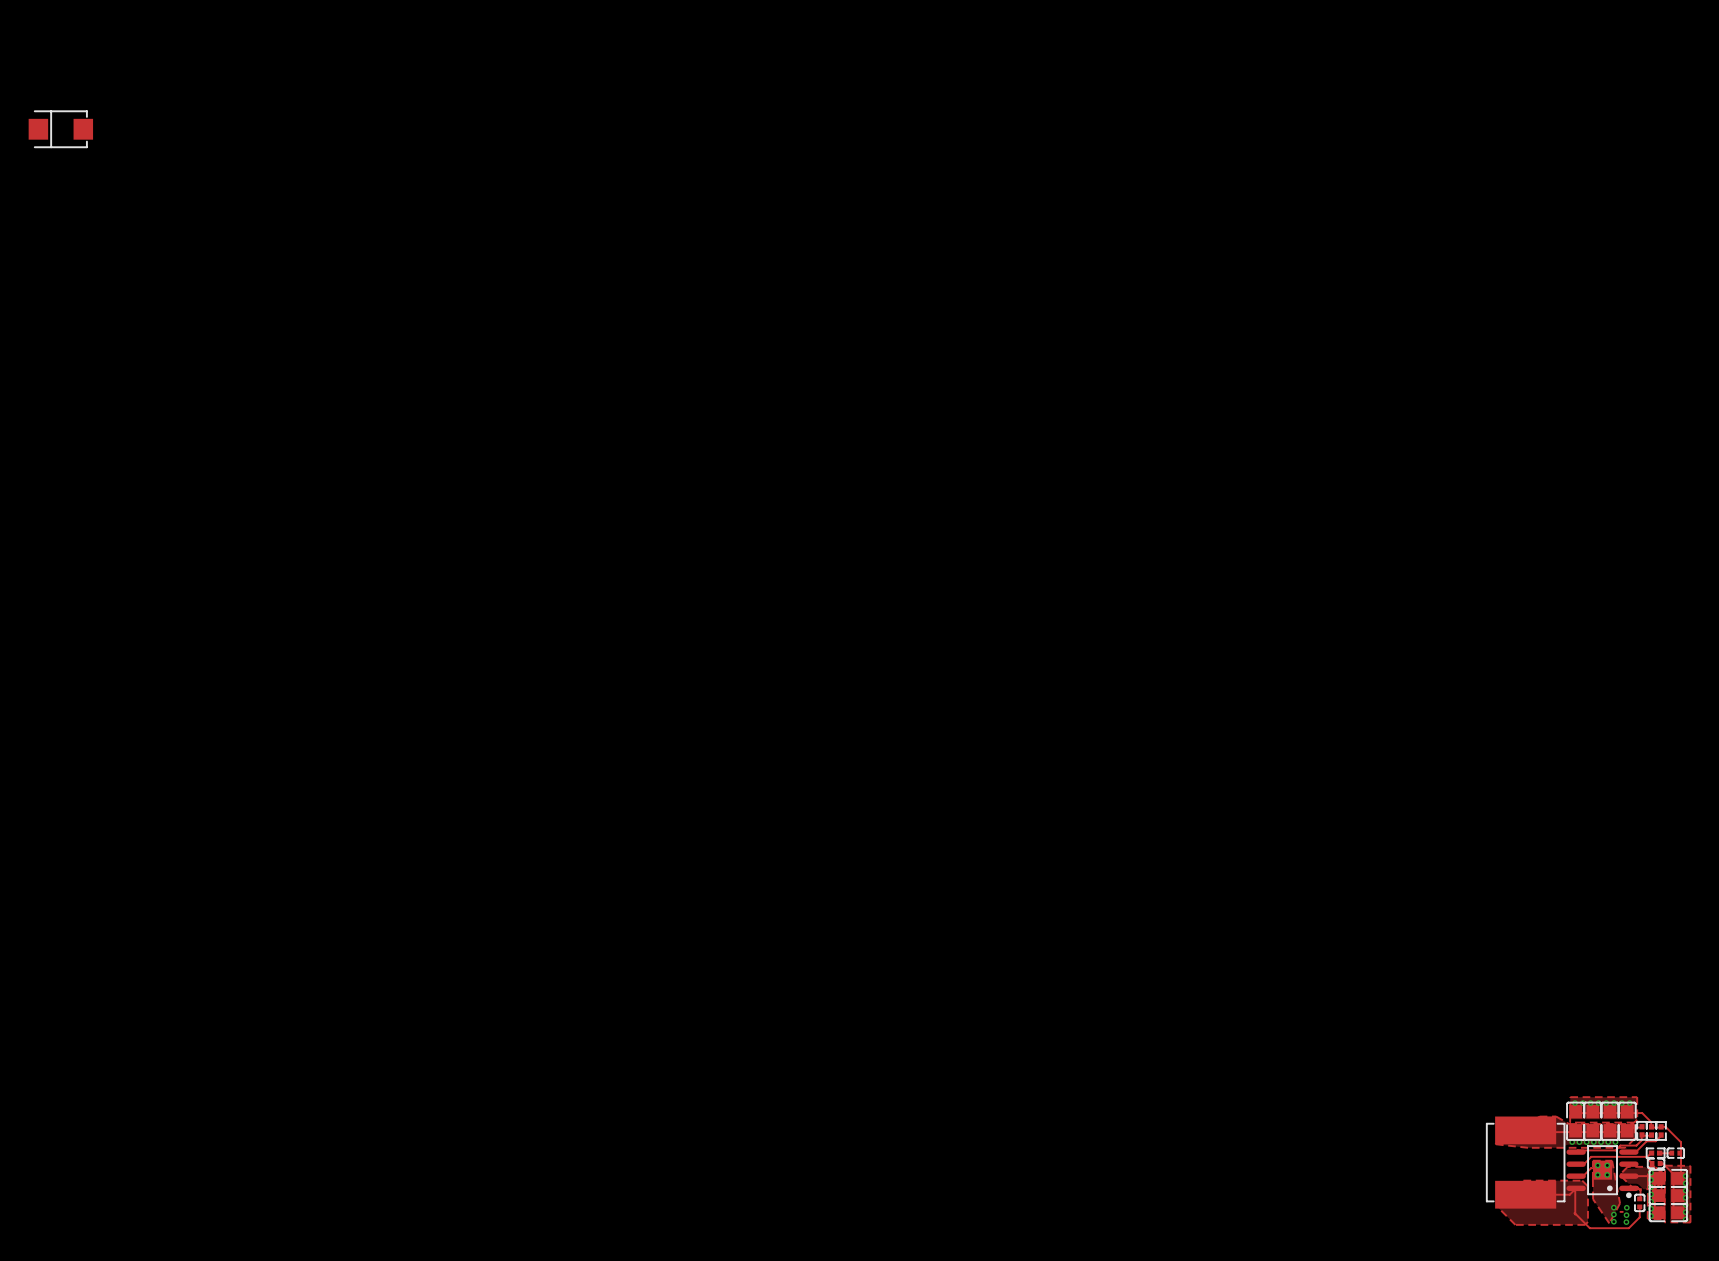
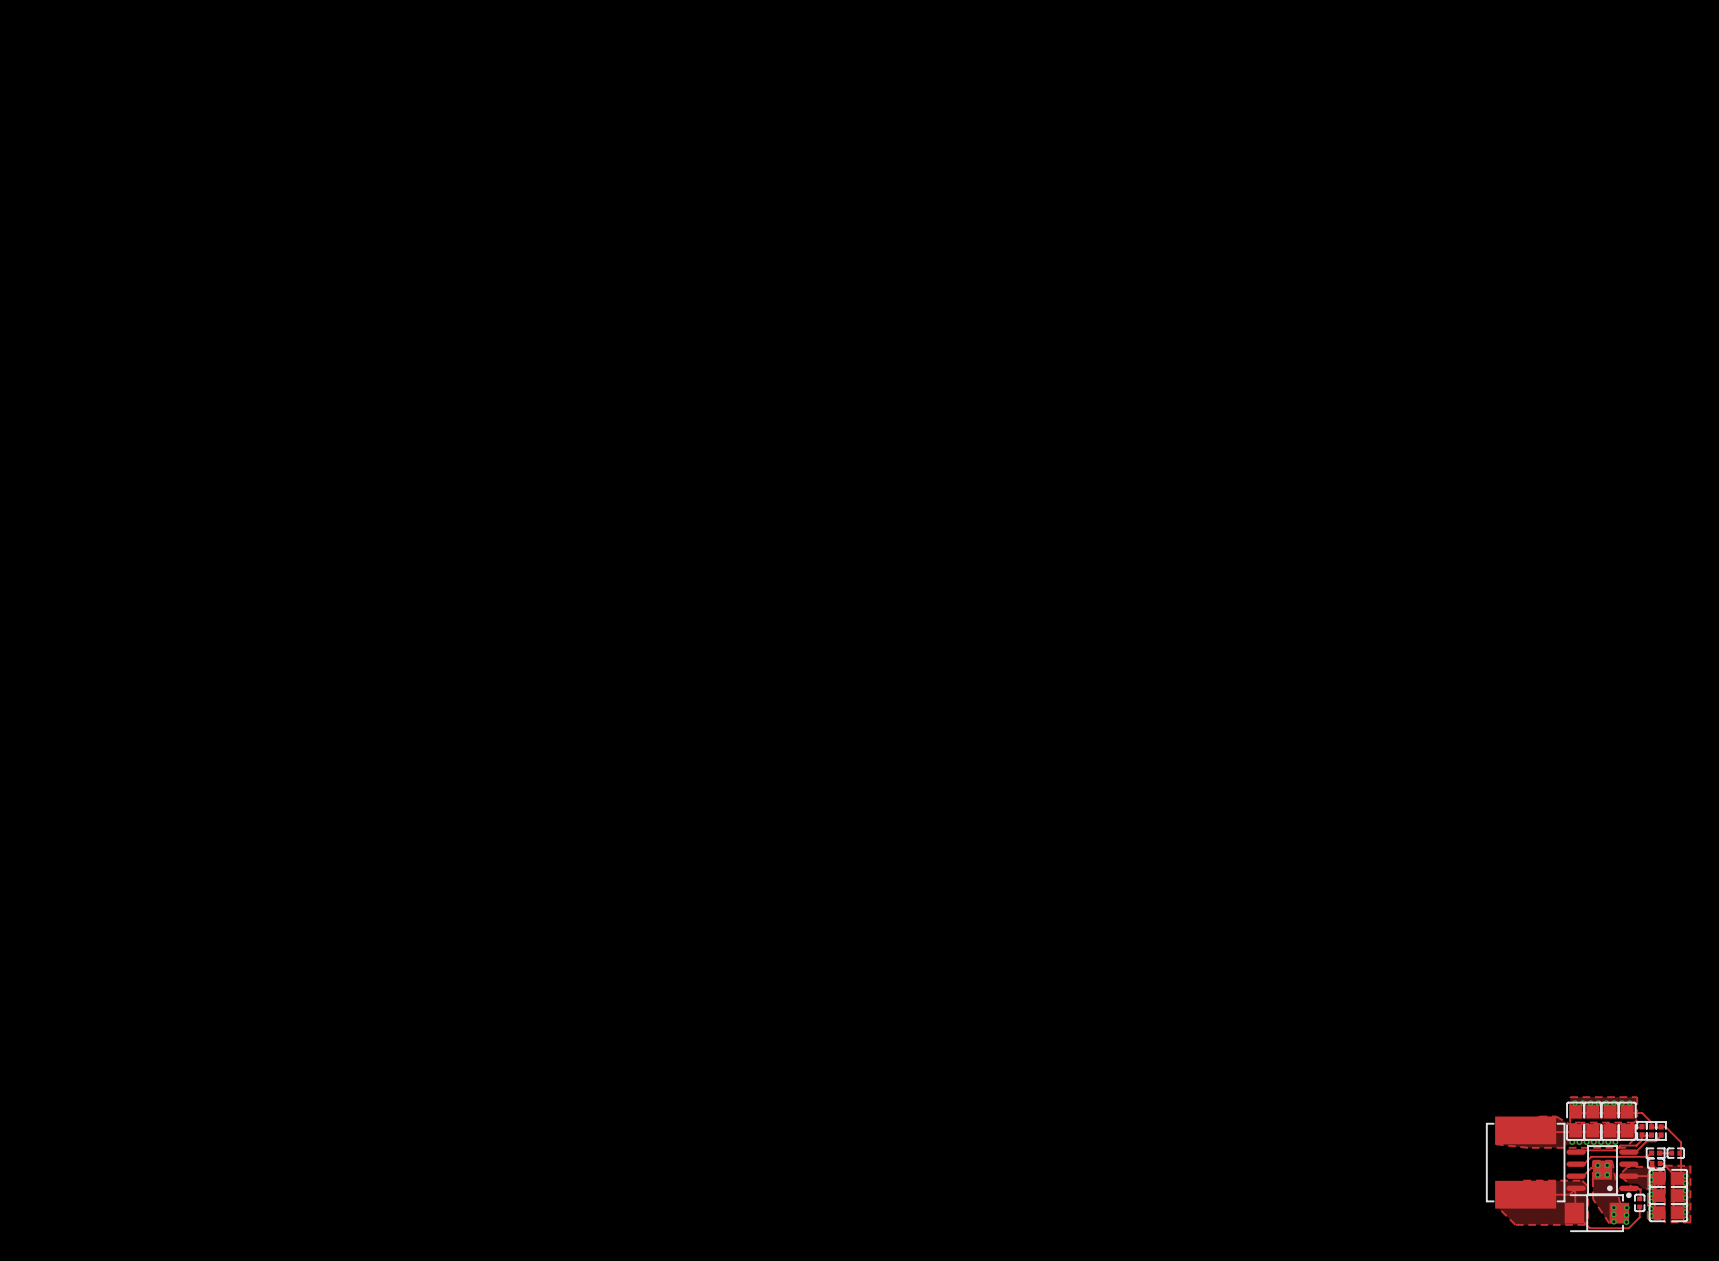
part: (60, 129) -> none
part: none -> (1596, 1213)

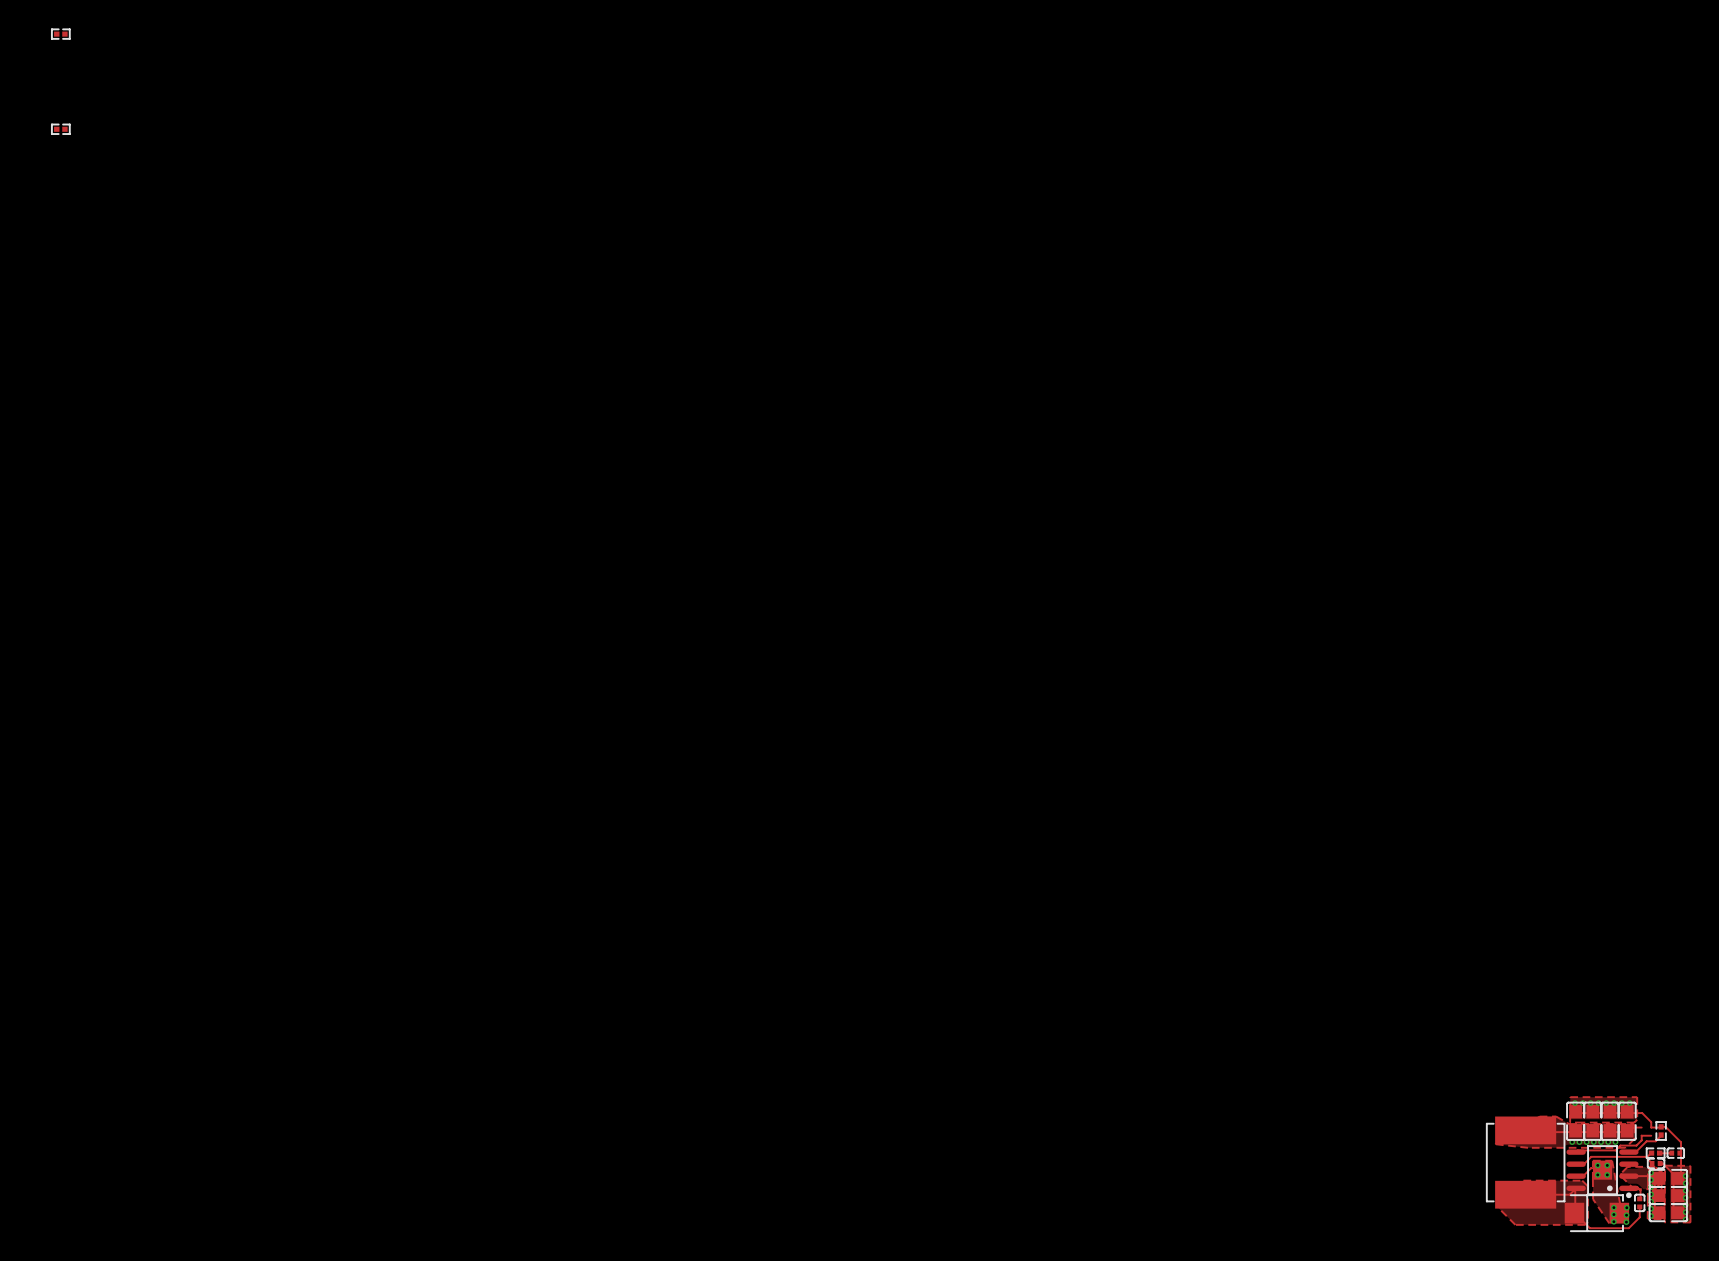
part: none -> (60, 34)
part: none -> (60, 129)
part: (1642, 1130) -> none
part: (1651, 1130) -> none

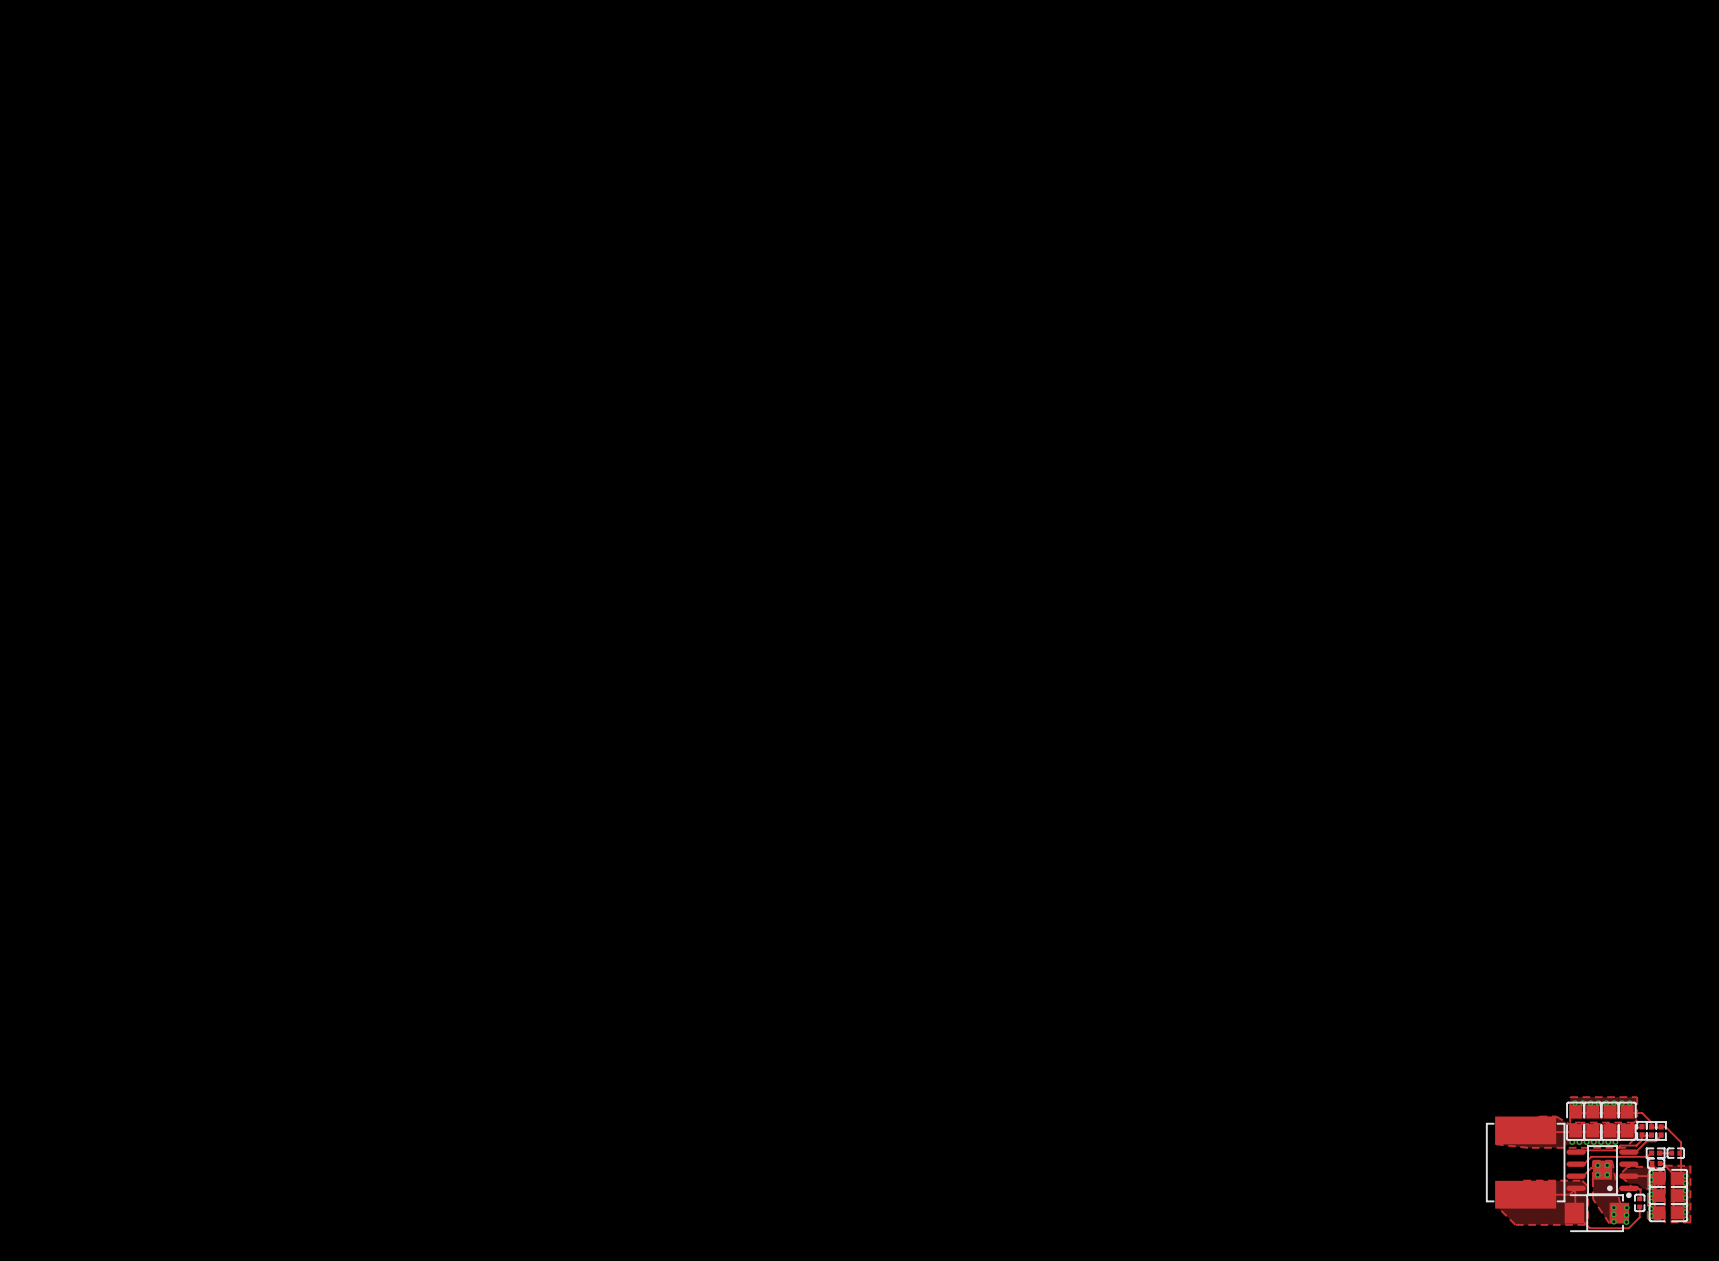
part: (60, 34) -> none
part: (60, 129) -> none
part: none -> (1642, 1130)
part: none -> (1651, 1130)

